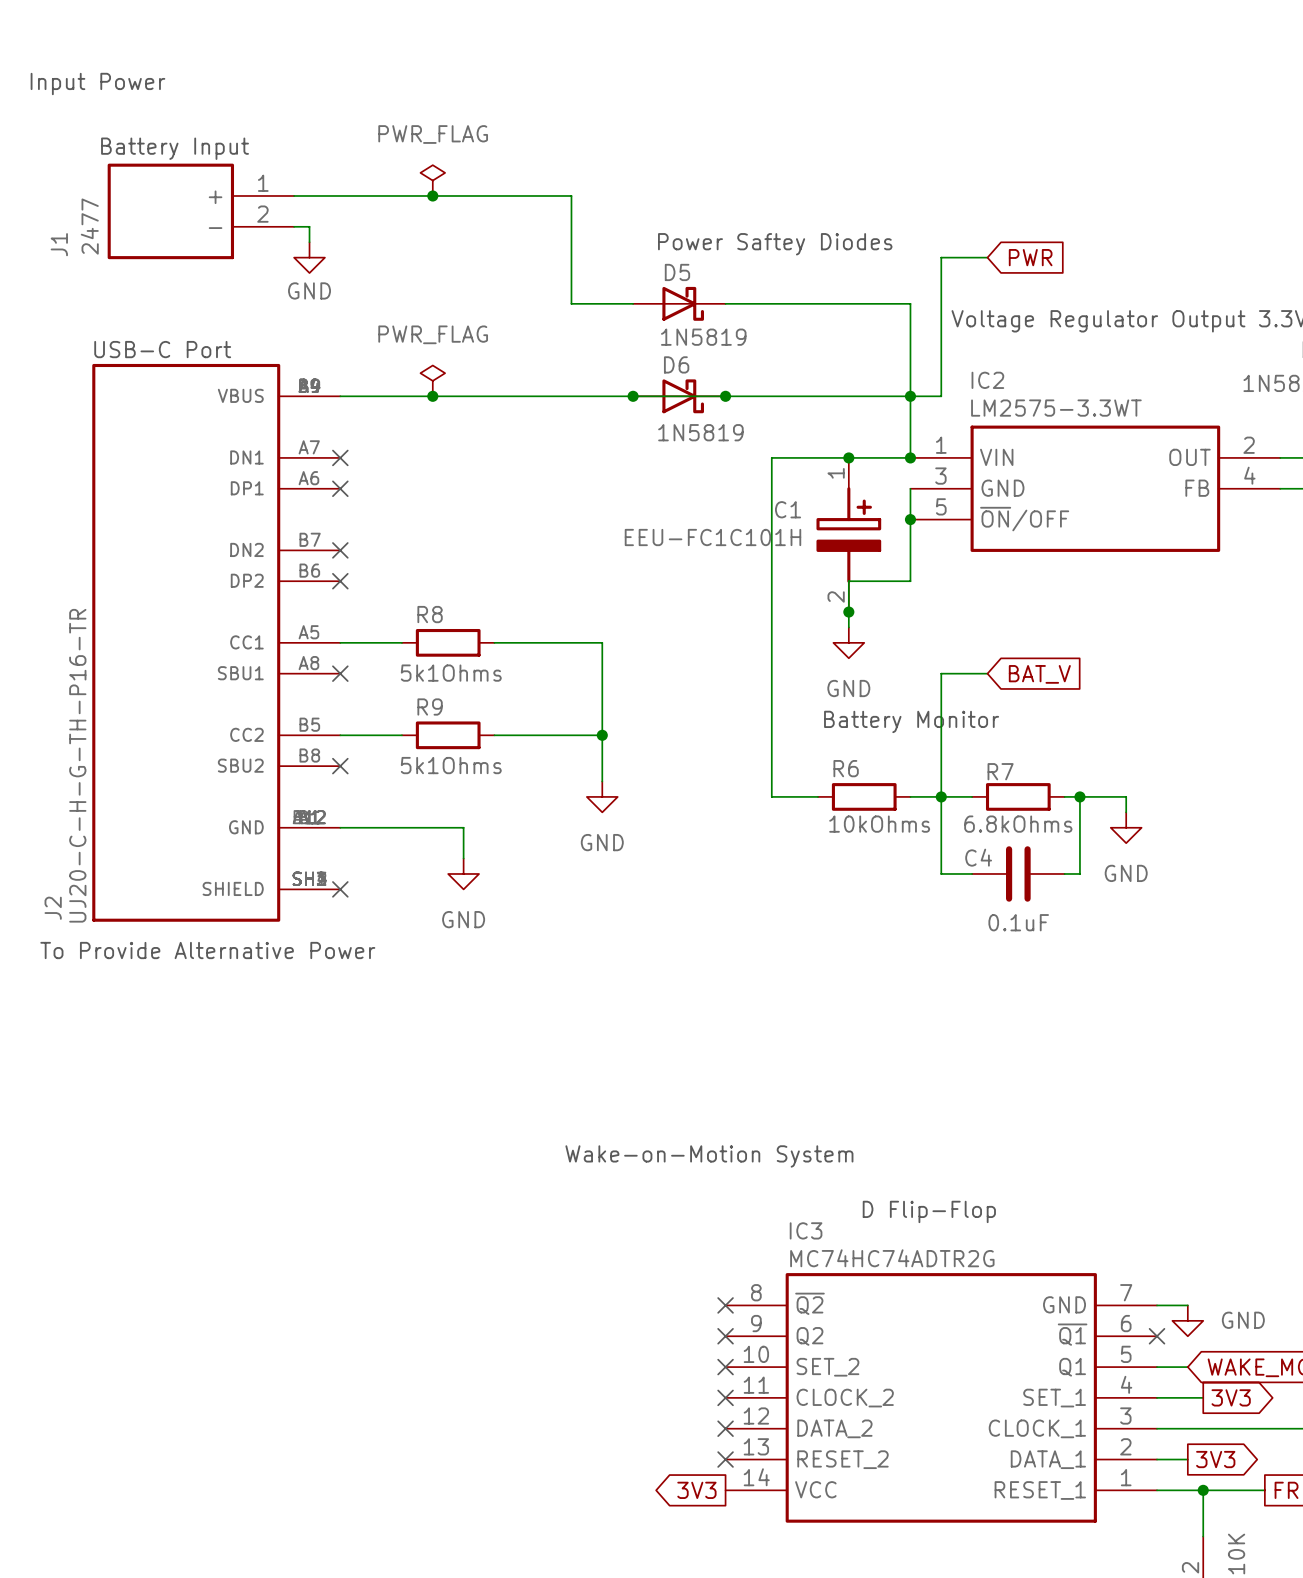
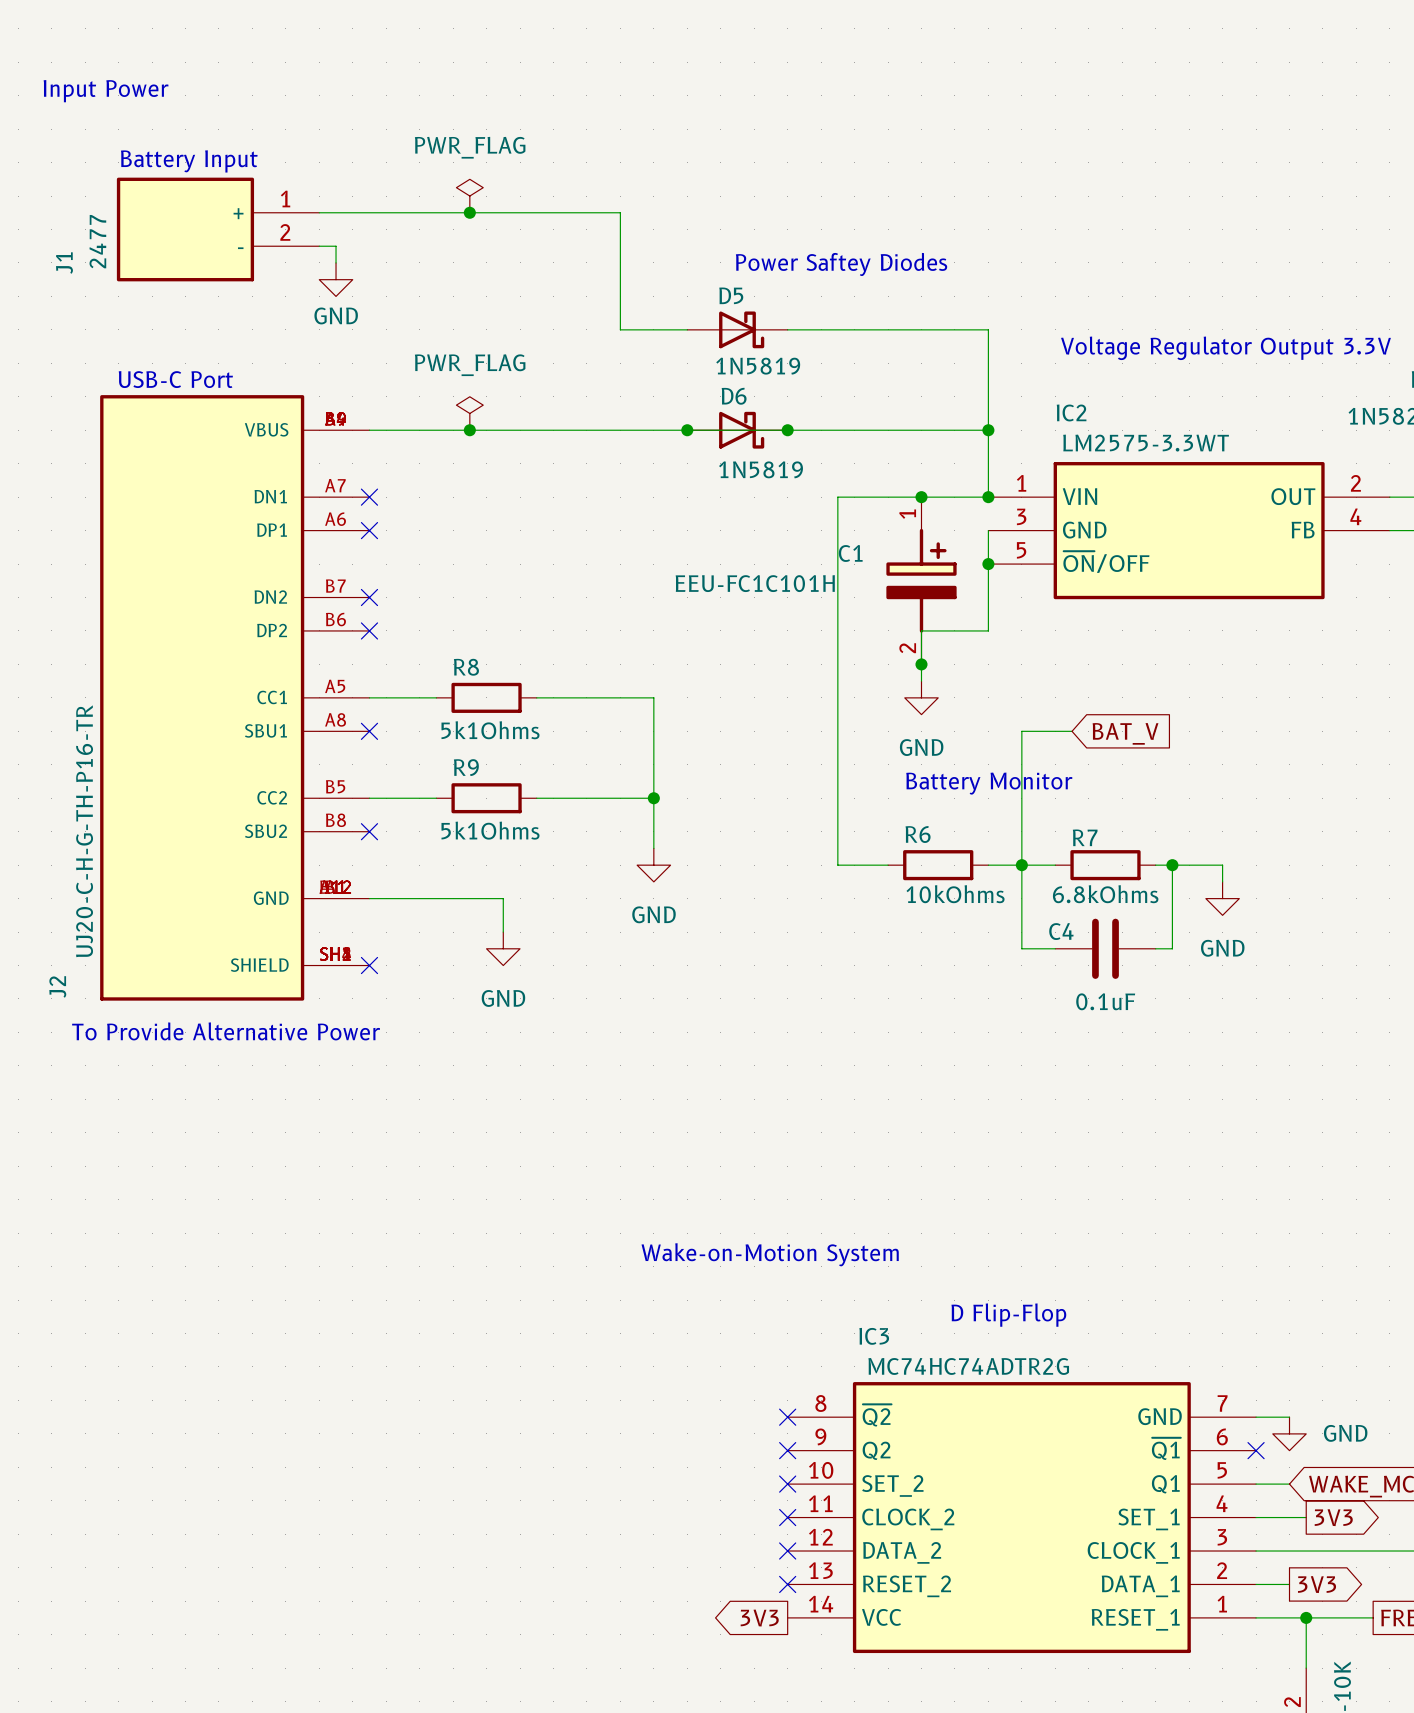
wire: (987, 257) (941, 257) (941, 396) (910, 396) -> none
global label: PWR (1030, 257) -> none

